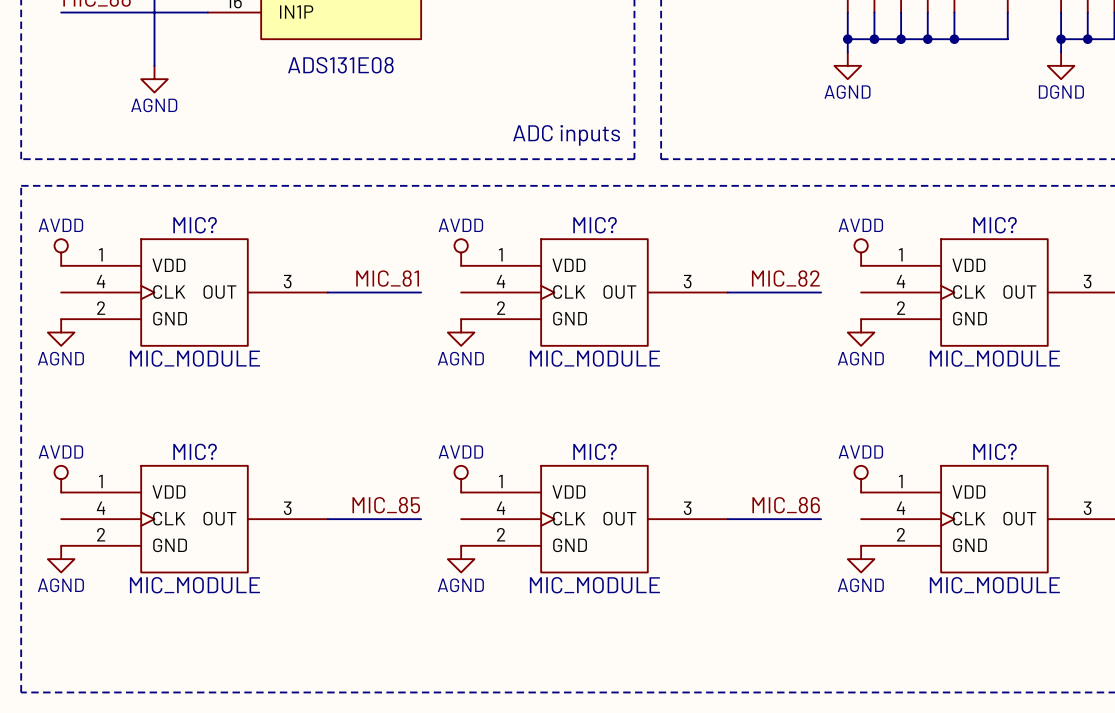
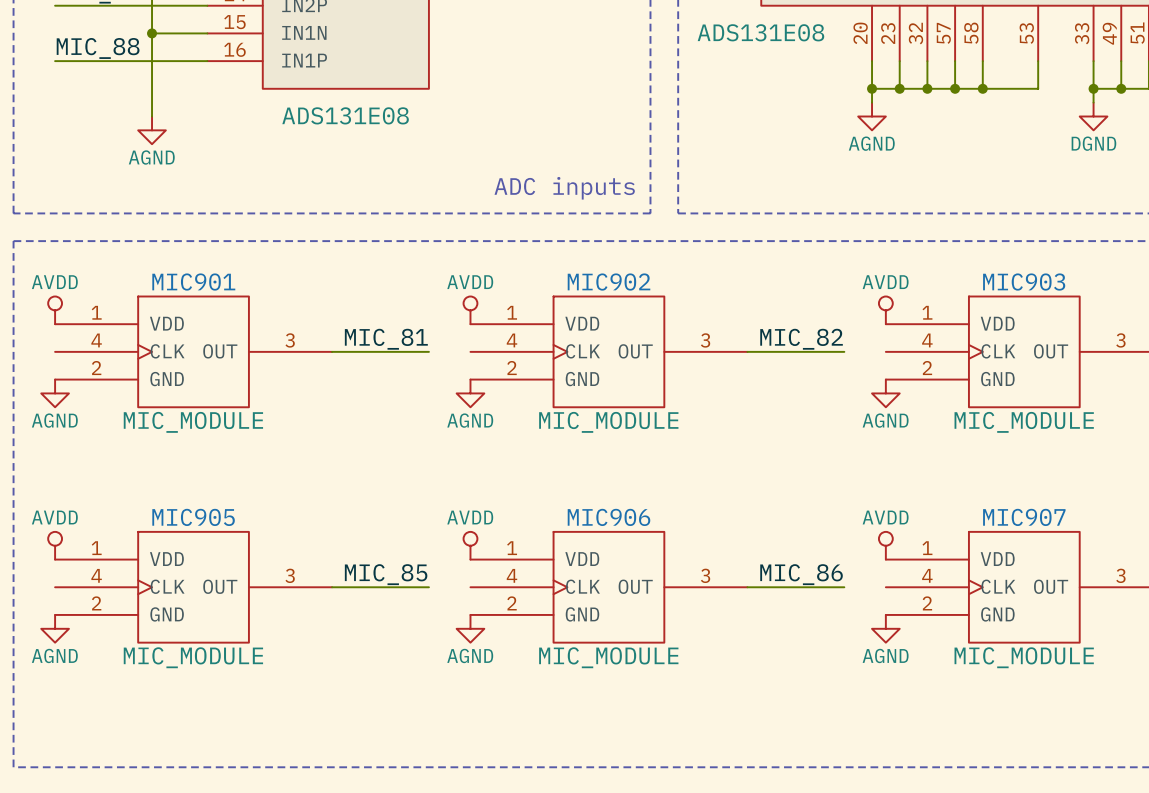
MIC? name: MIC? (195, 225) -> MIC901 (193, 282)
MIC? name: MIC? (595, 225) -> MIC902 (609, 282)
MIC? name: MIC? (995, 225) -> MIC903 (1024, 282)
MIC? name: MIC? (195, 451) -> MIC905 (193, 517)
MIC? name: MIC? (595, 451) -> MIC906 (608, 517)
MIC? name: MIC? (995, 451) -> MIC907 (1024, 517)

